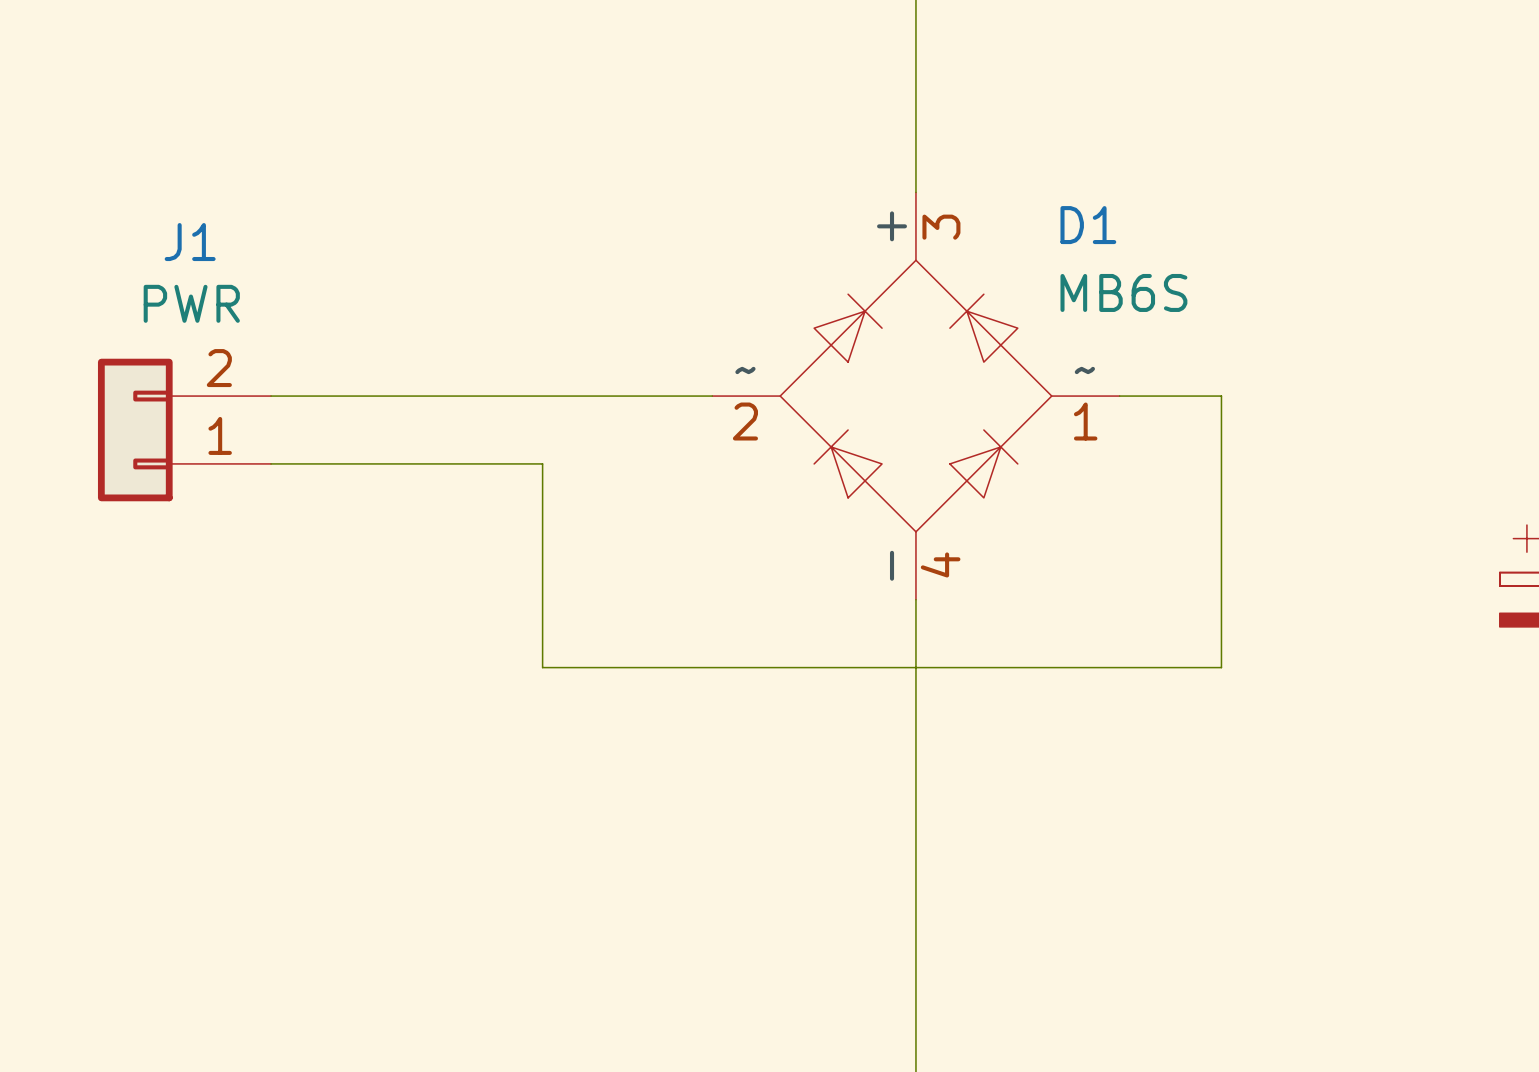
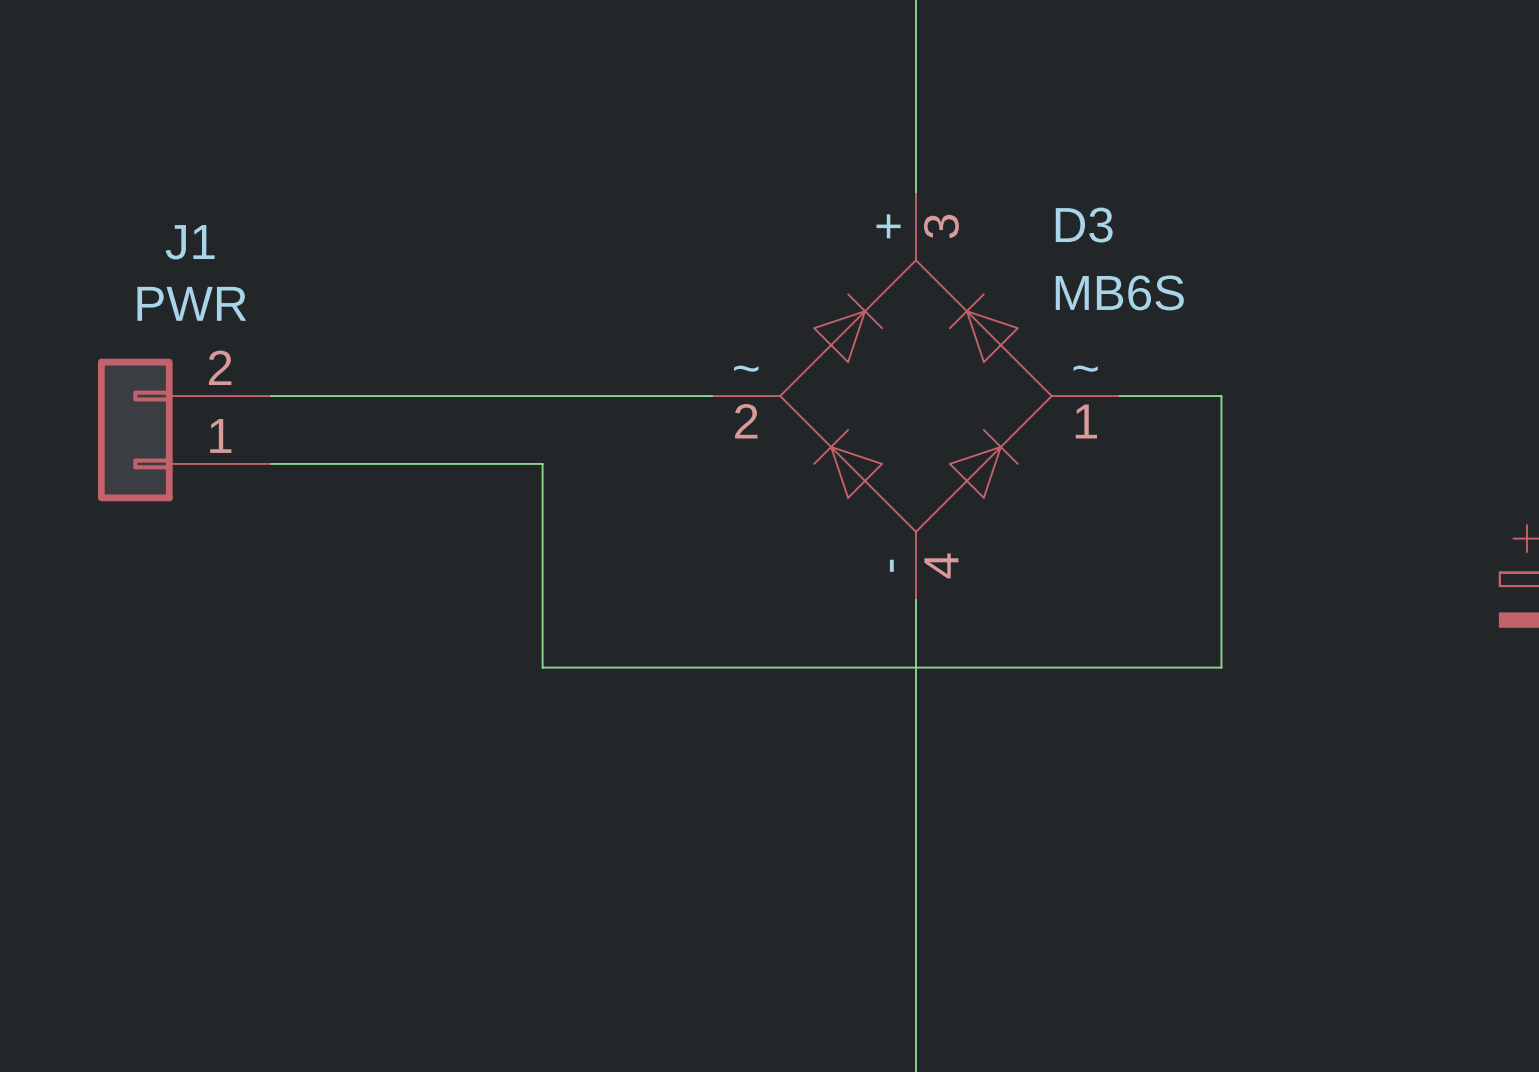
D1 name: D1 (1088, 225) -> D3 (1084, 225)

